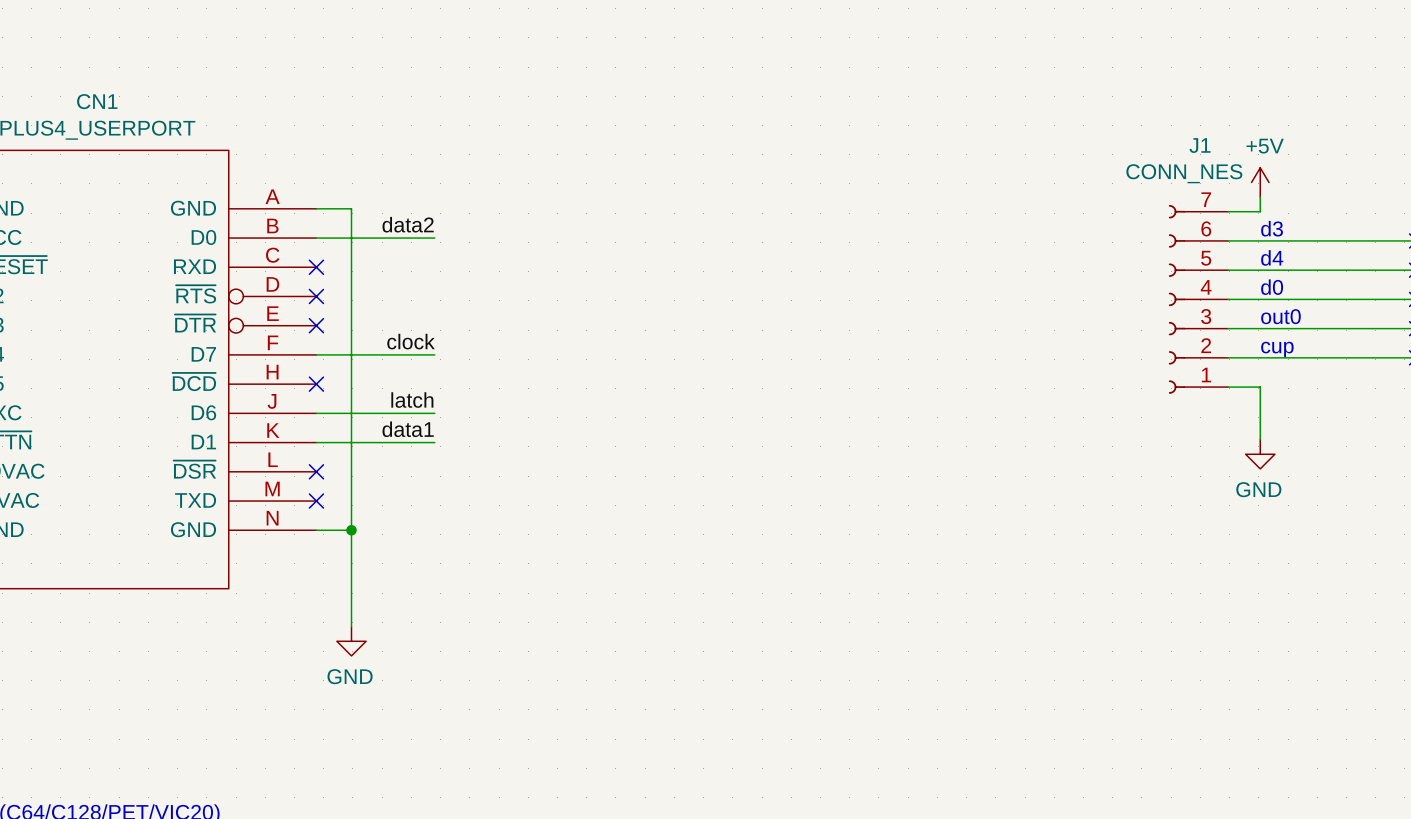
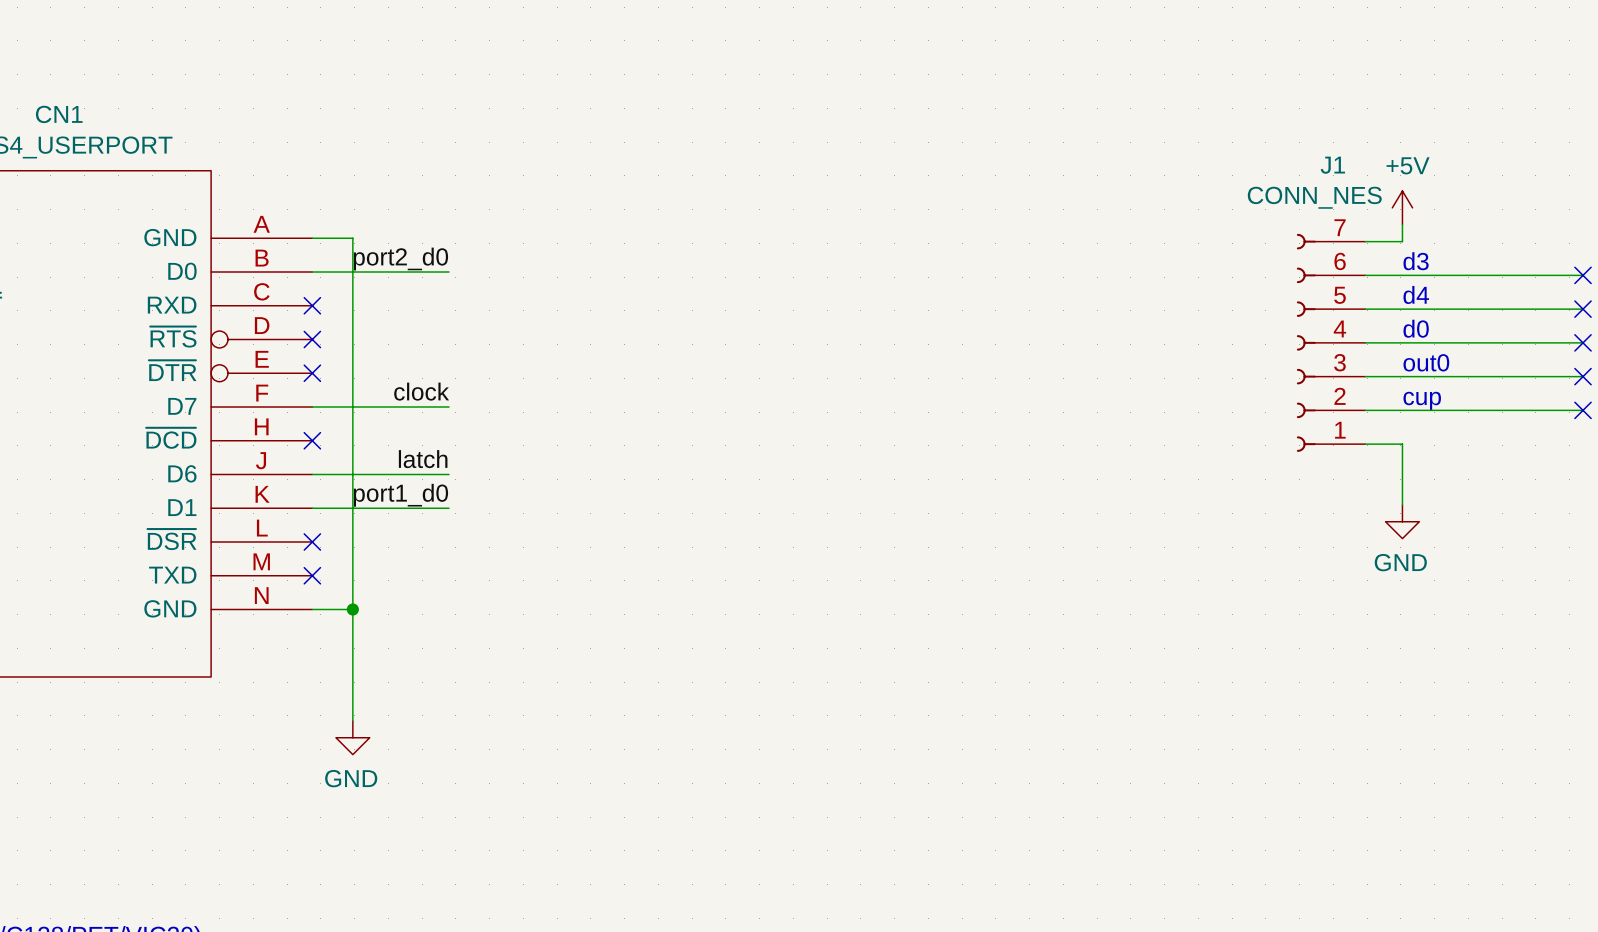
label: data2 (408, 224) -> port2_d0 (400, 259)
label: data1 (408, 429) -> port1_d0 (400, 495)

